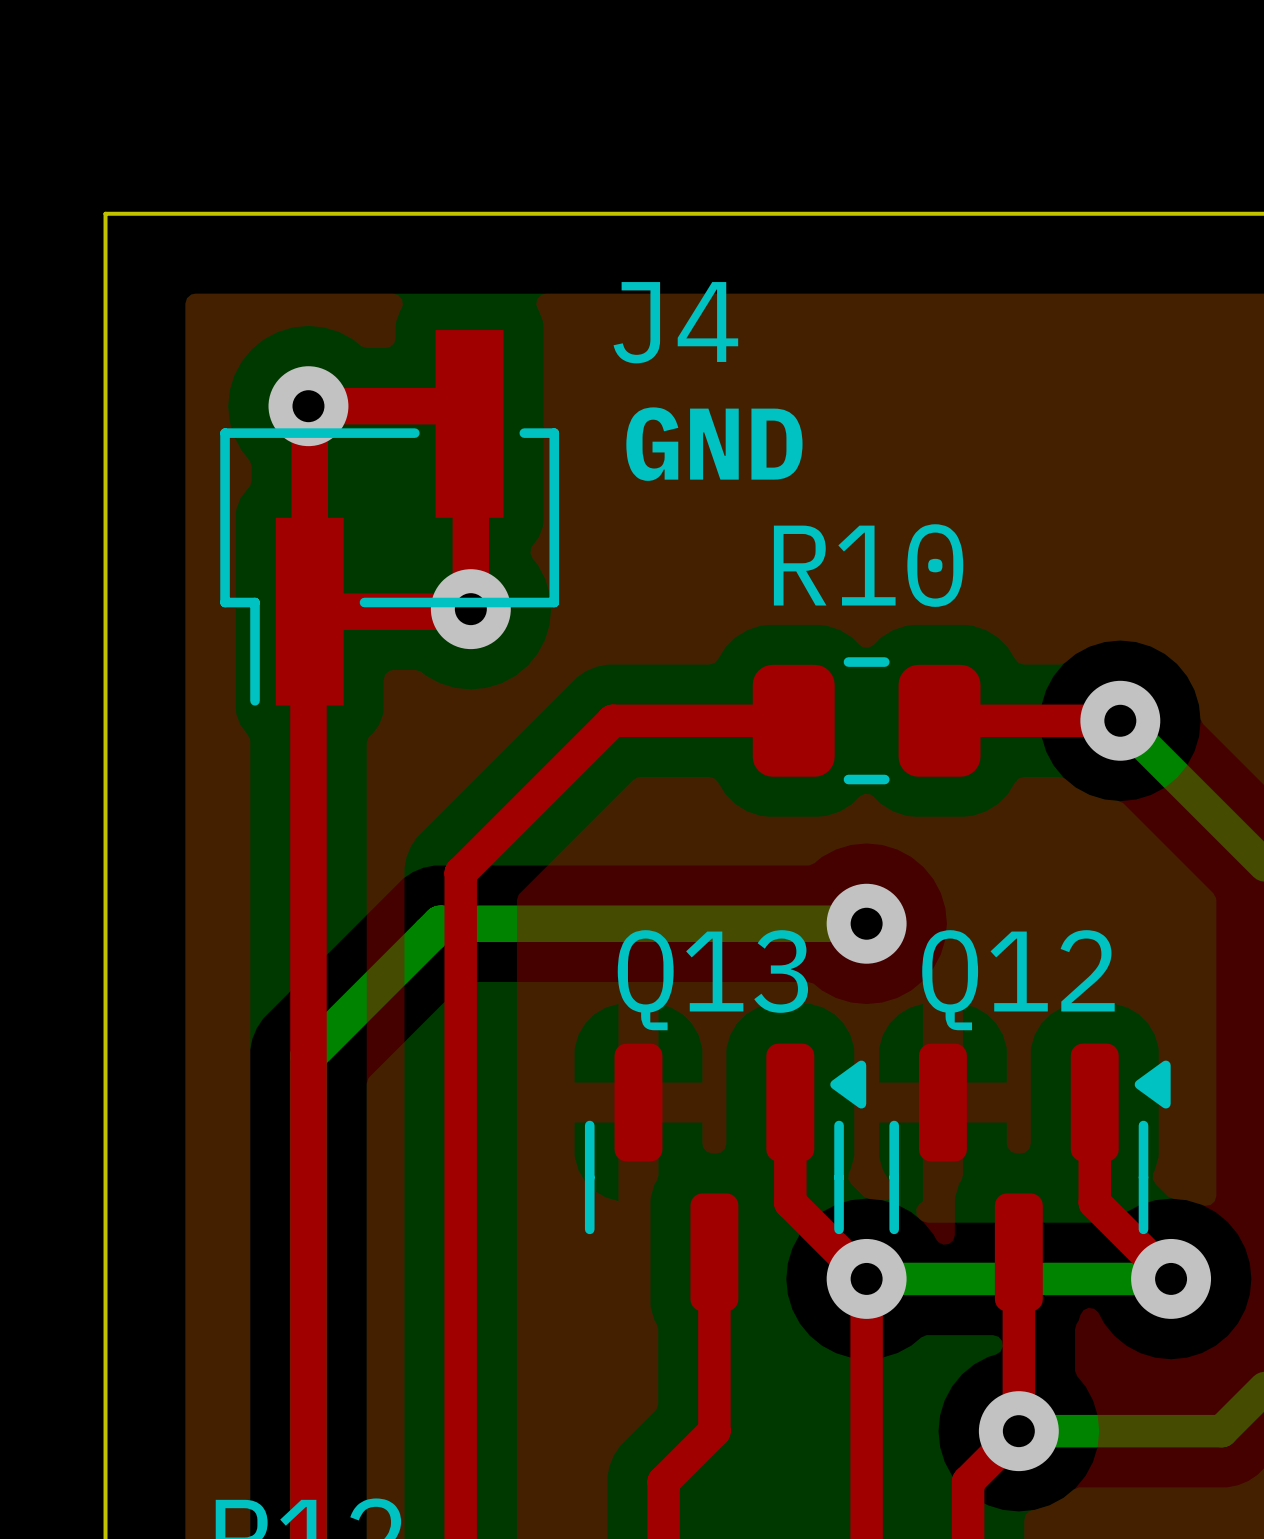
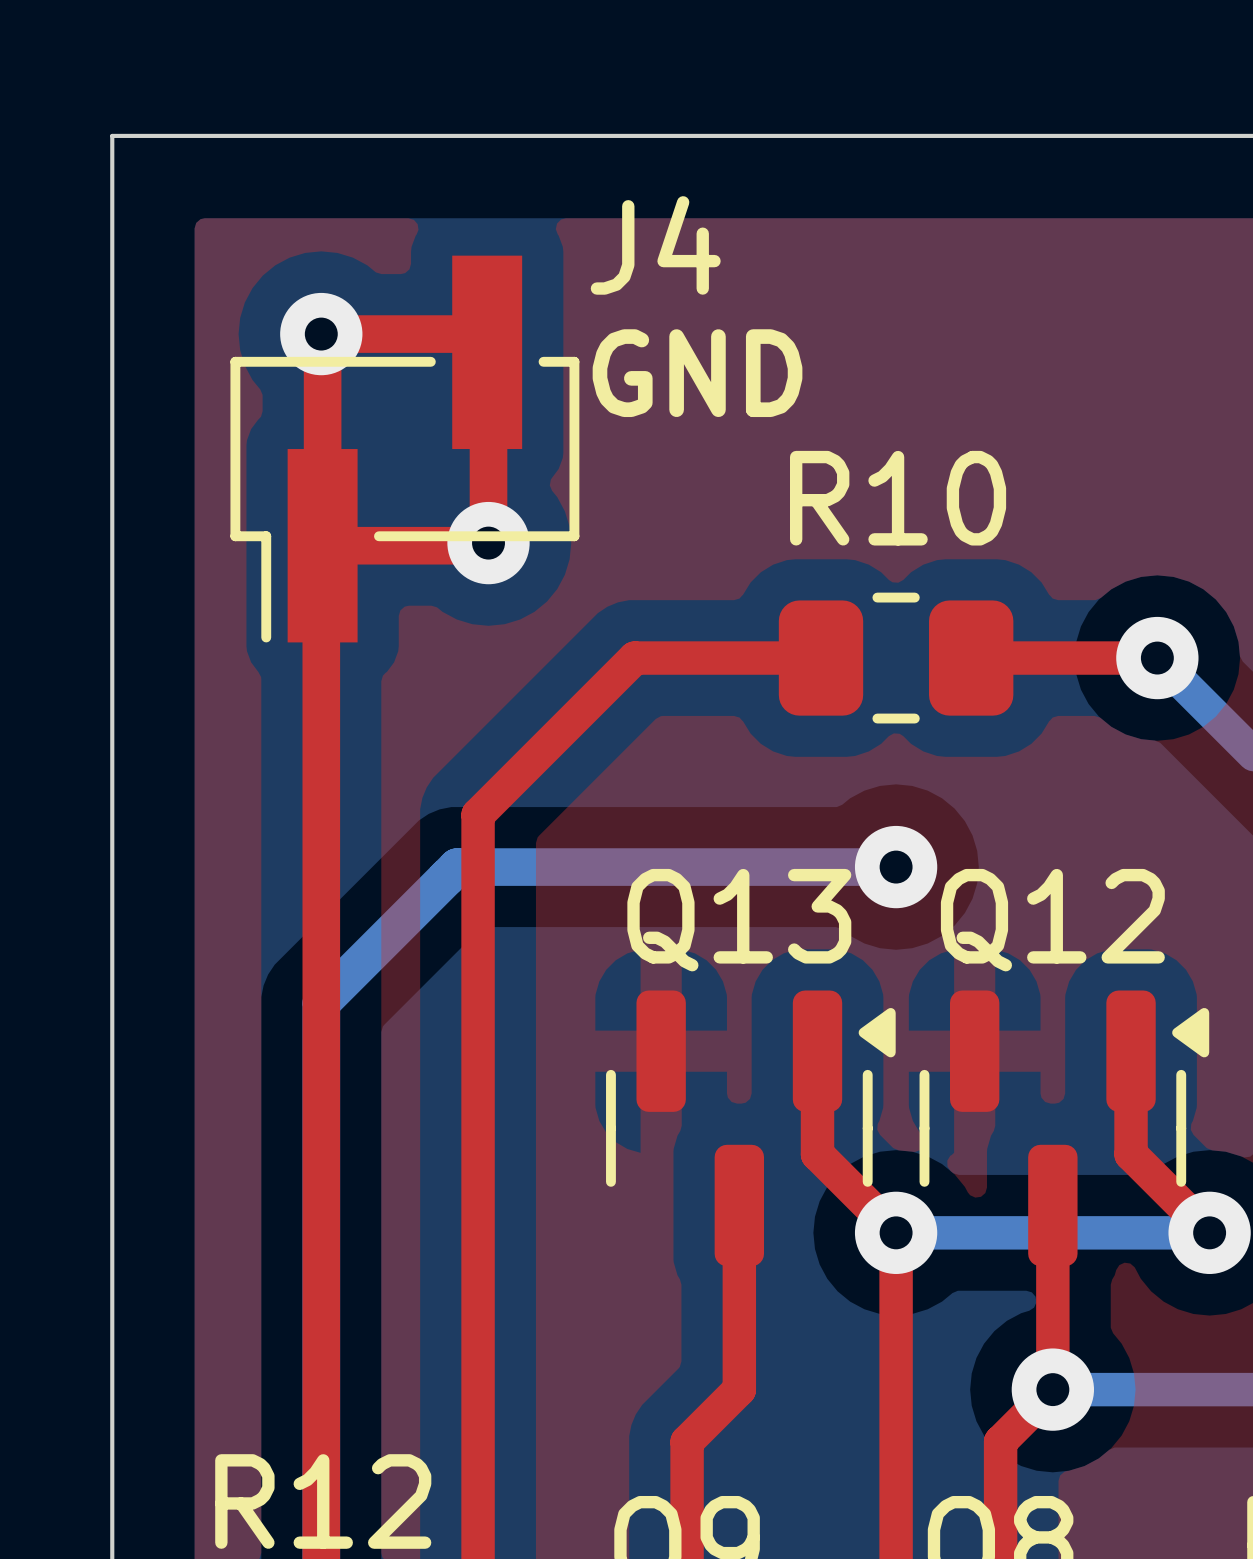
J4 name position: J4 (675, 322) -> J4 (655, 245)
J4 value position: GND (714, 444) -> GND (697, 373)

